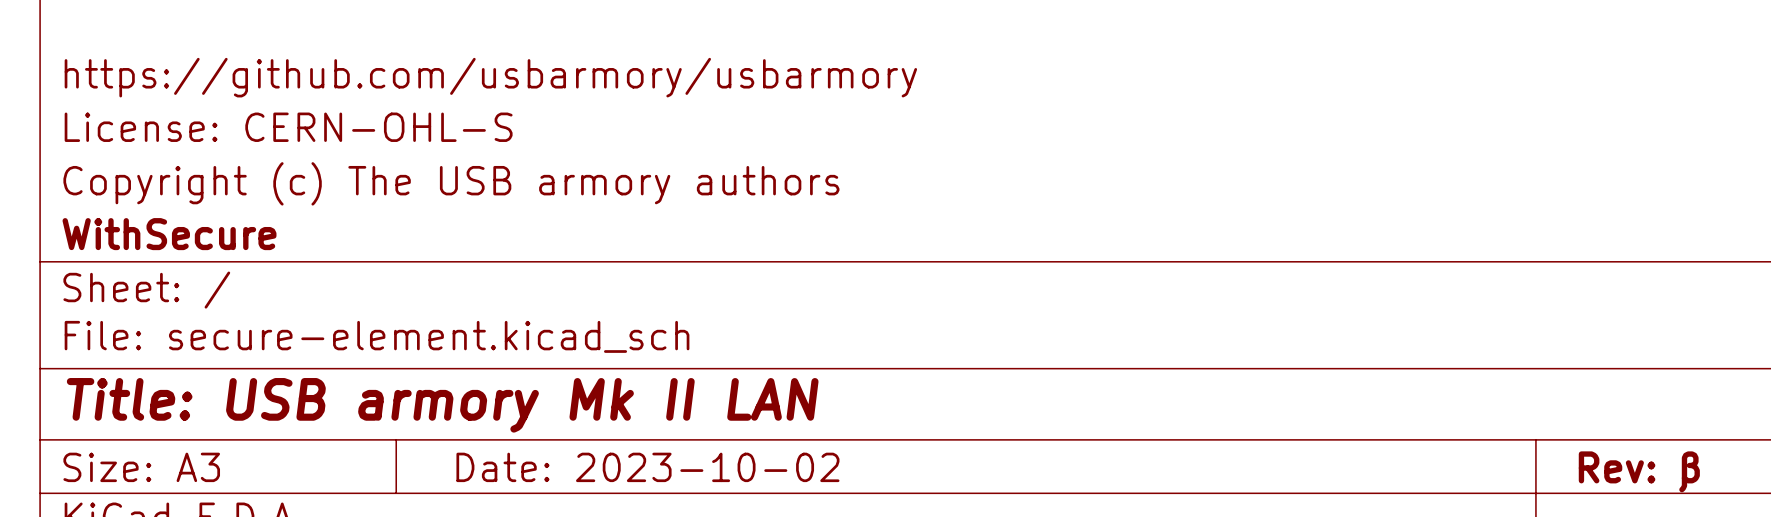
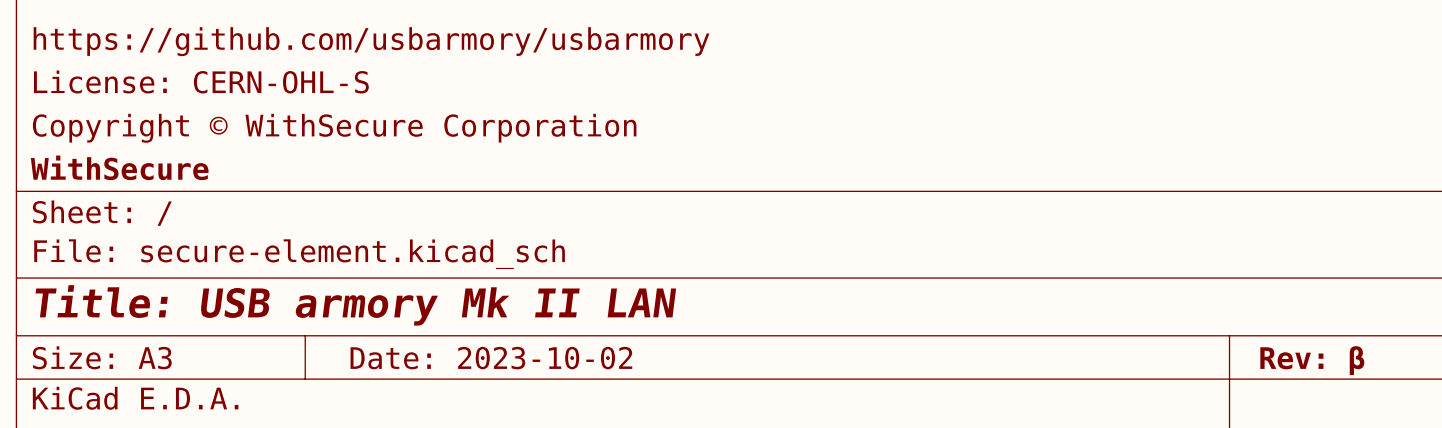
title block: Copyright (c) The USB armory authors (451, 183) -> Copyright © WithSecure Corporation (334, 128)

